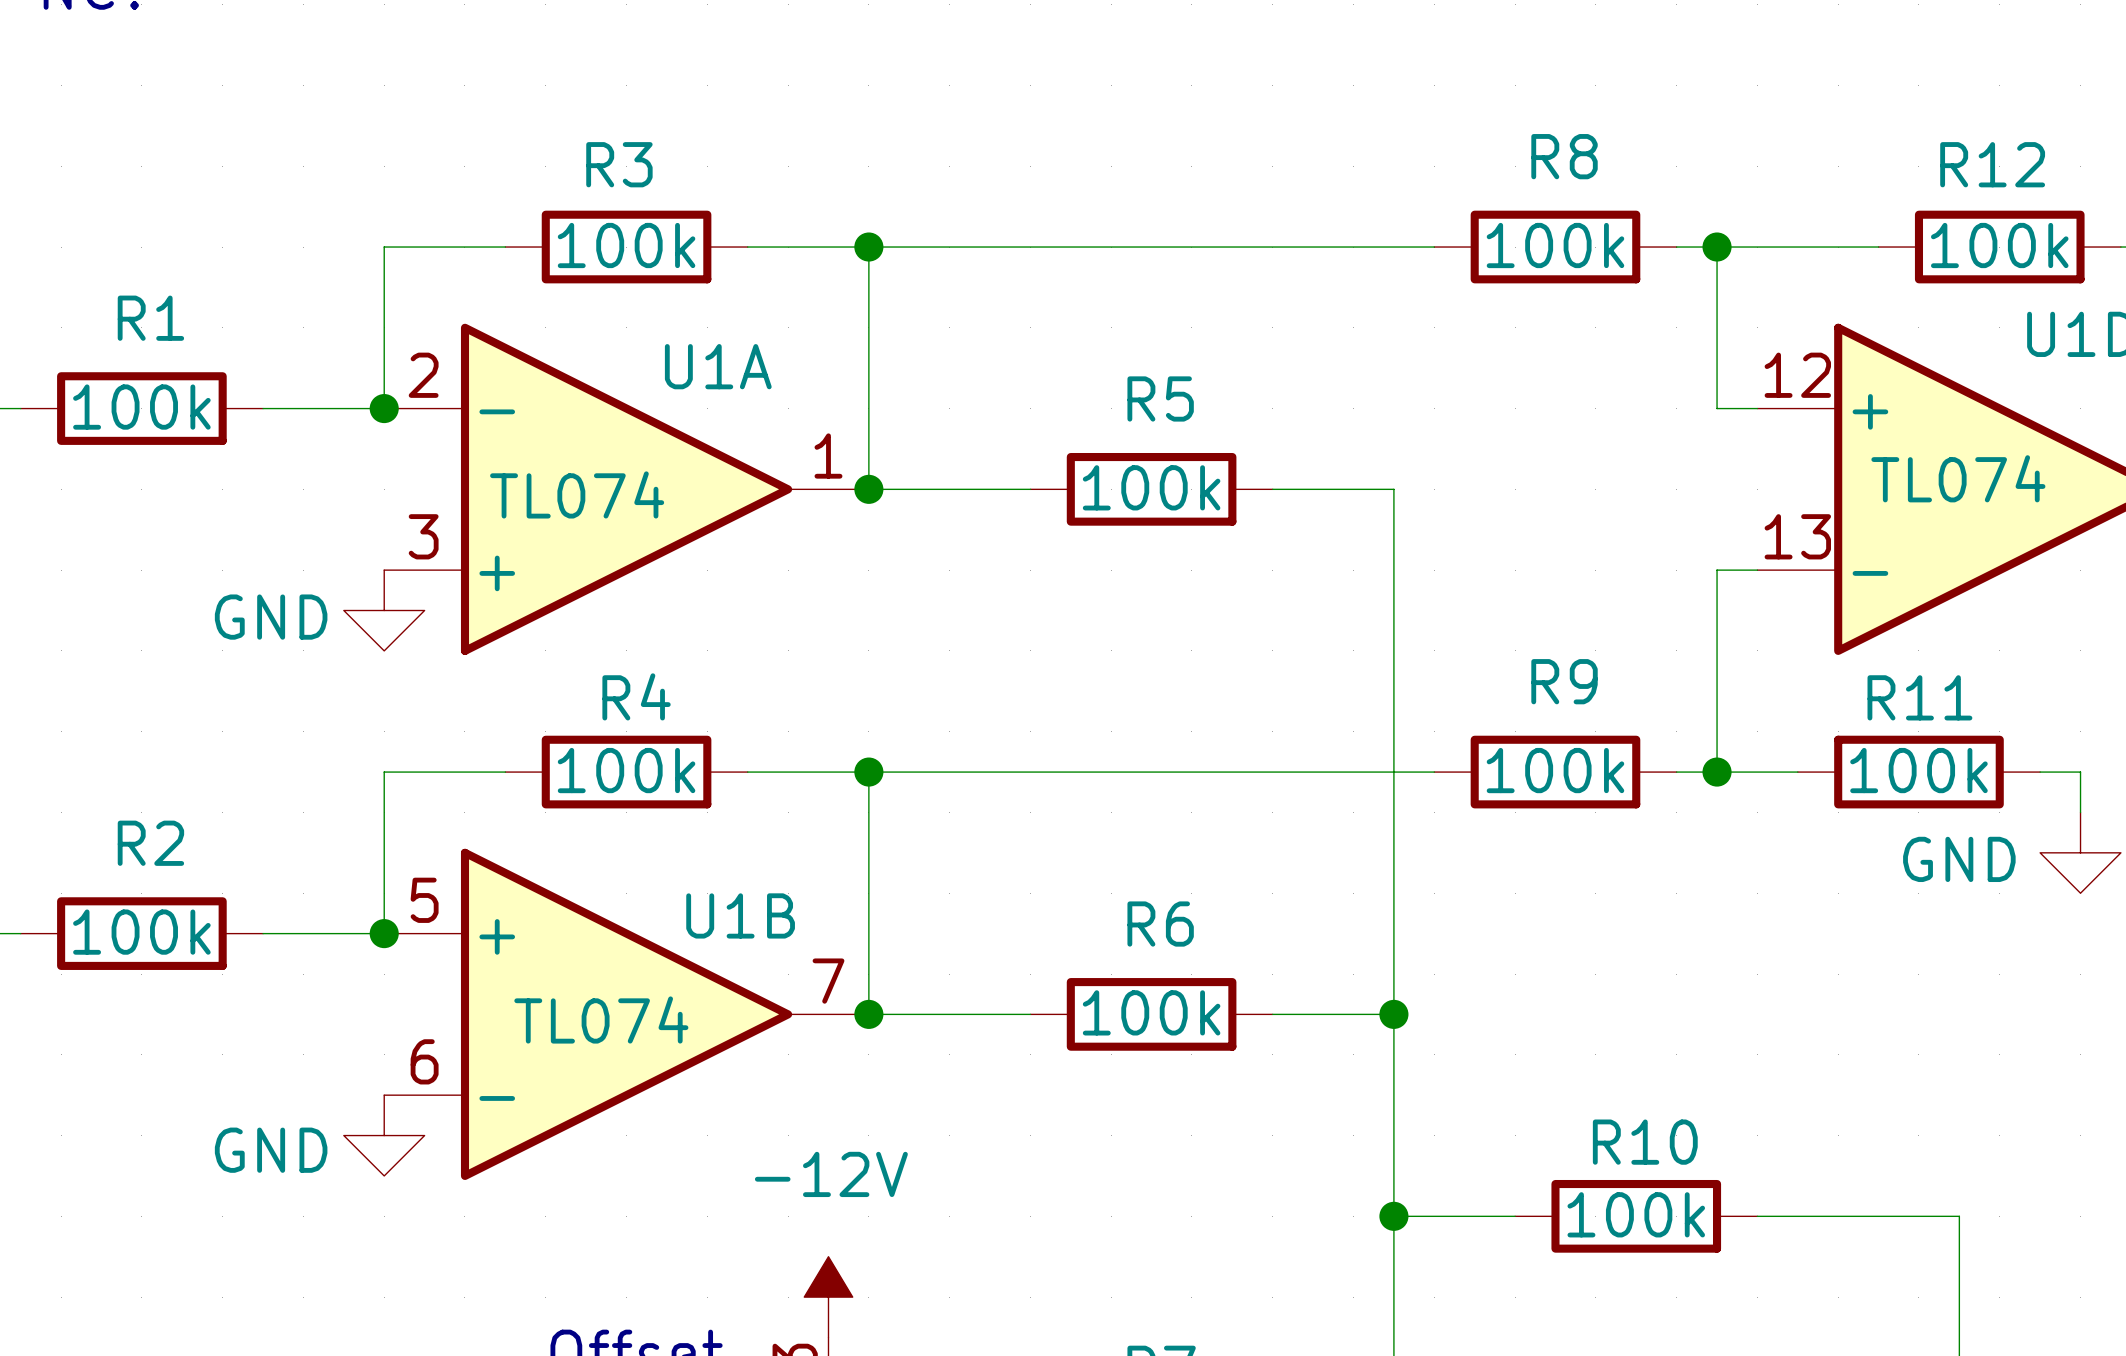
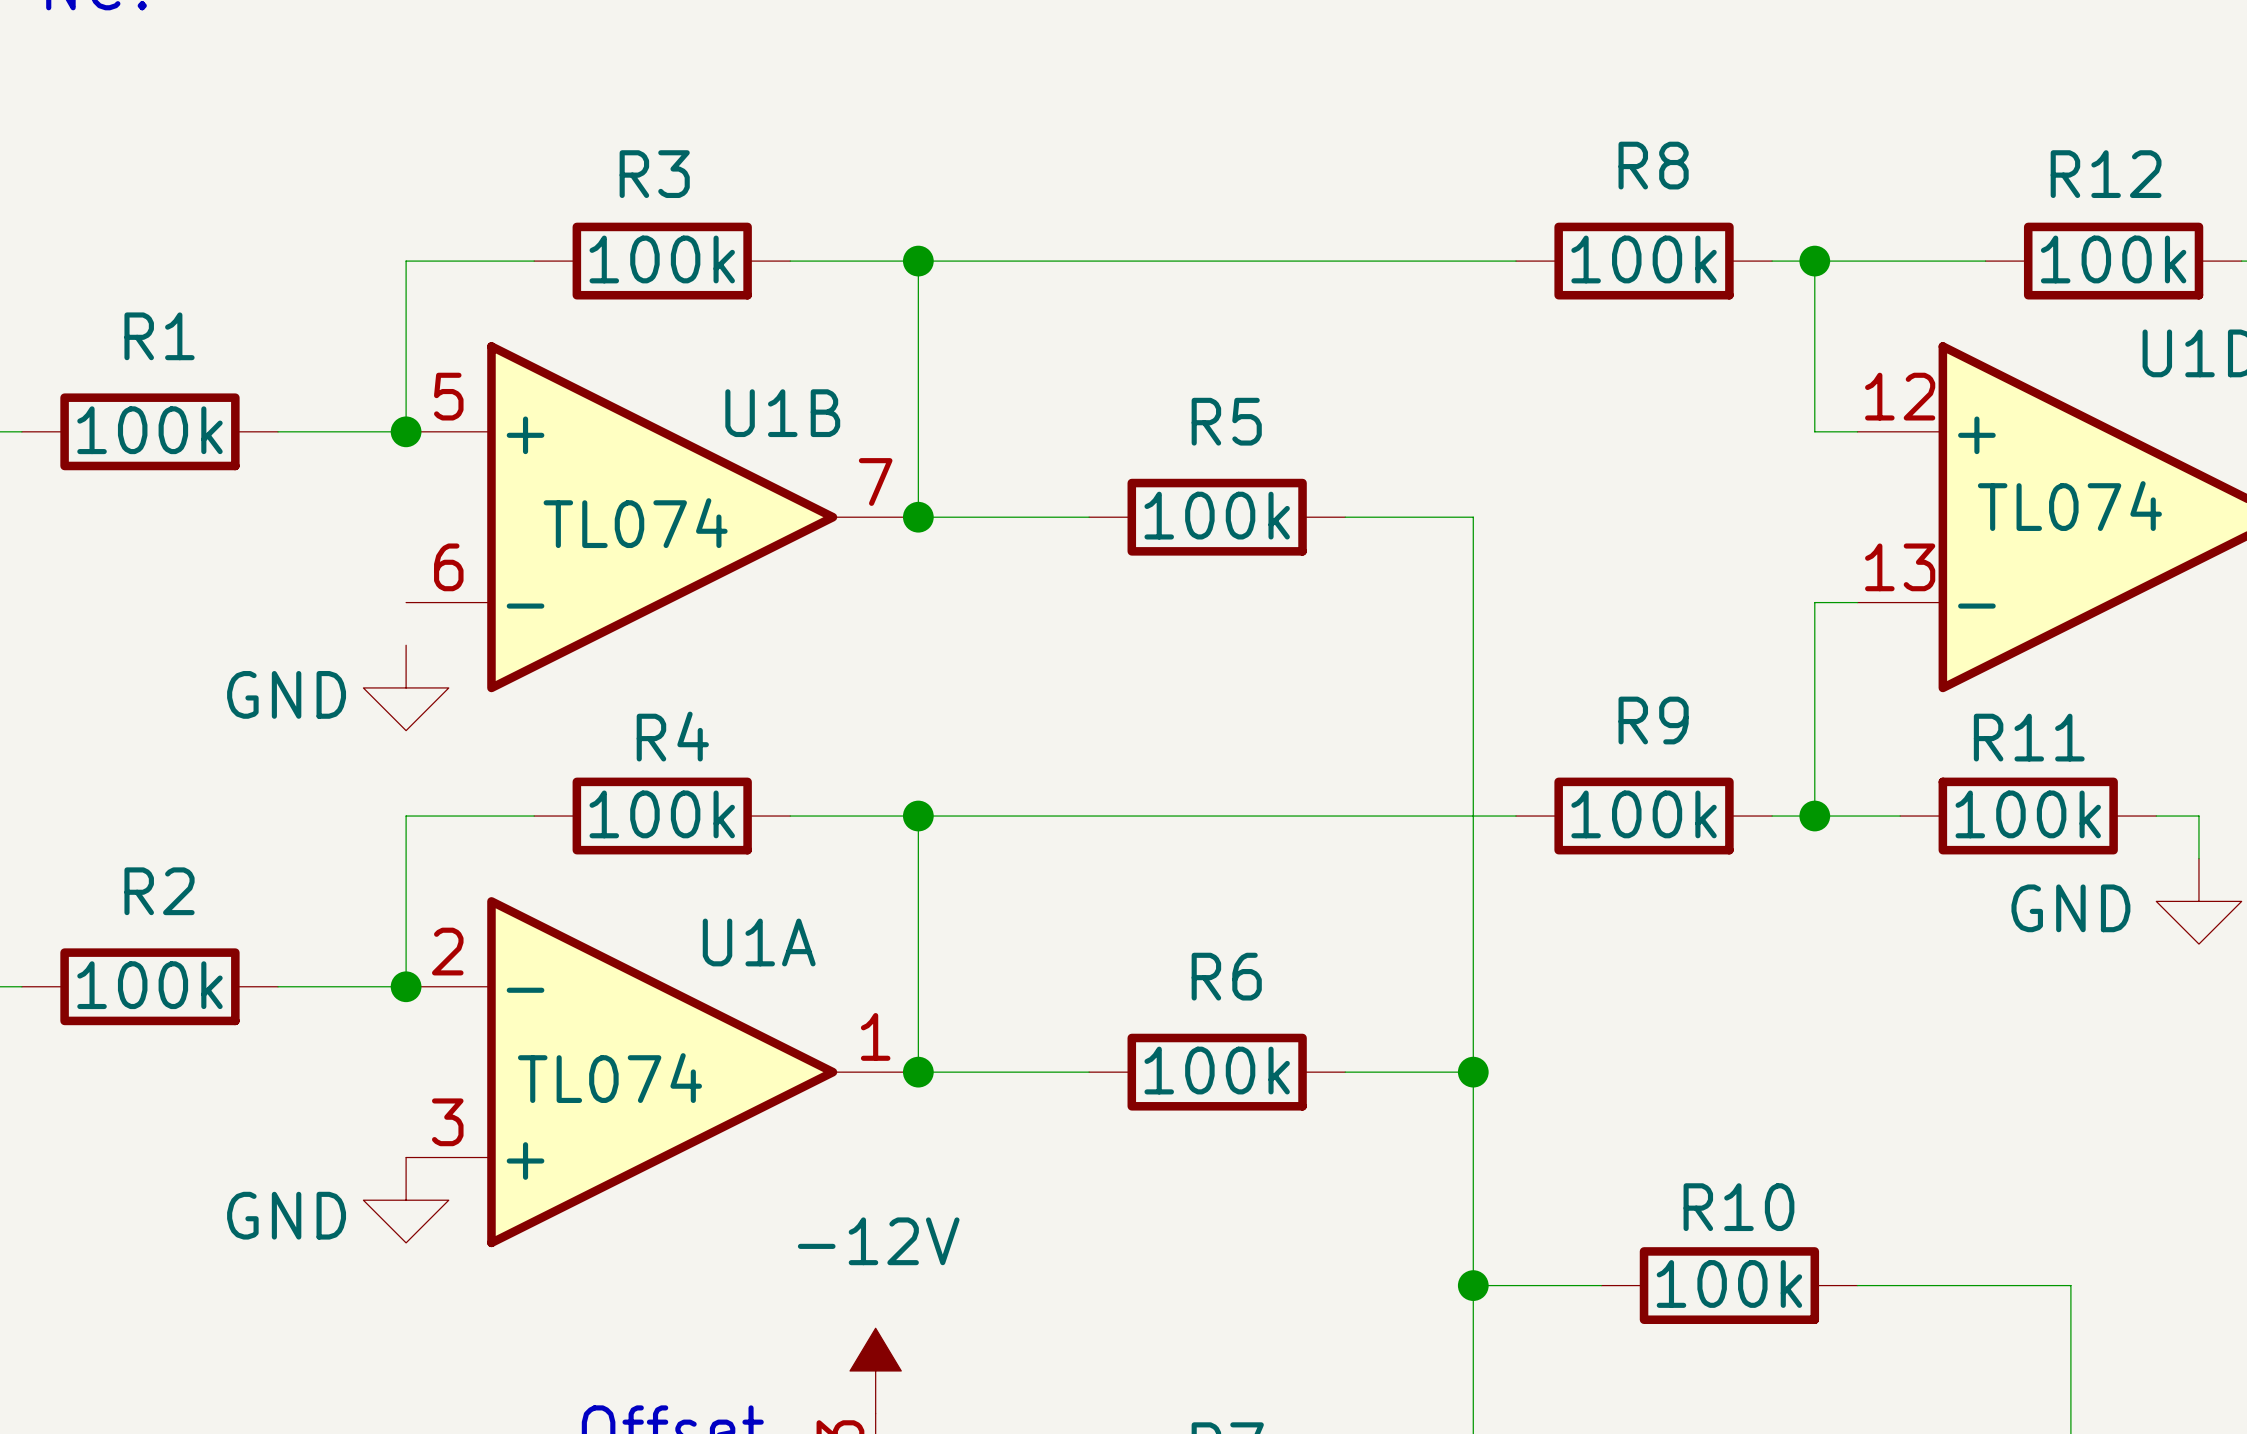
U1A position: (626, 489) -> (662, 1072)
power symbol position: GND (384, 610) -> GND (406, 687)
U1B position: (626, 1014) -> (662, 517)

